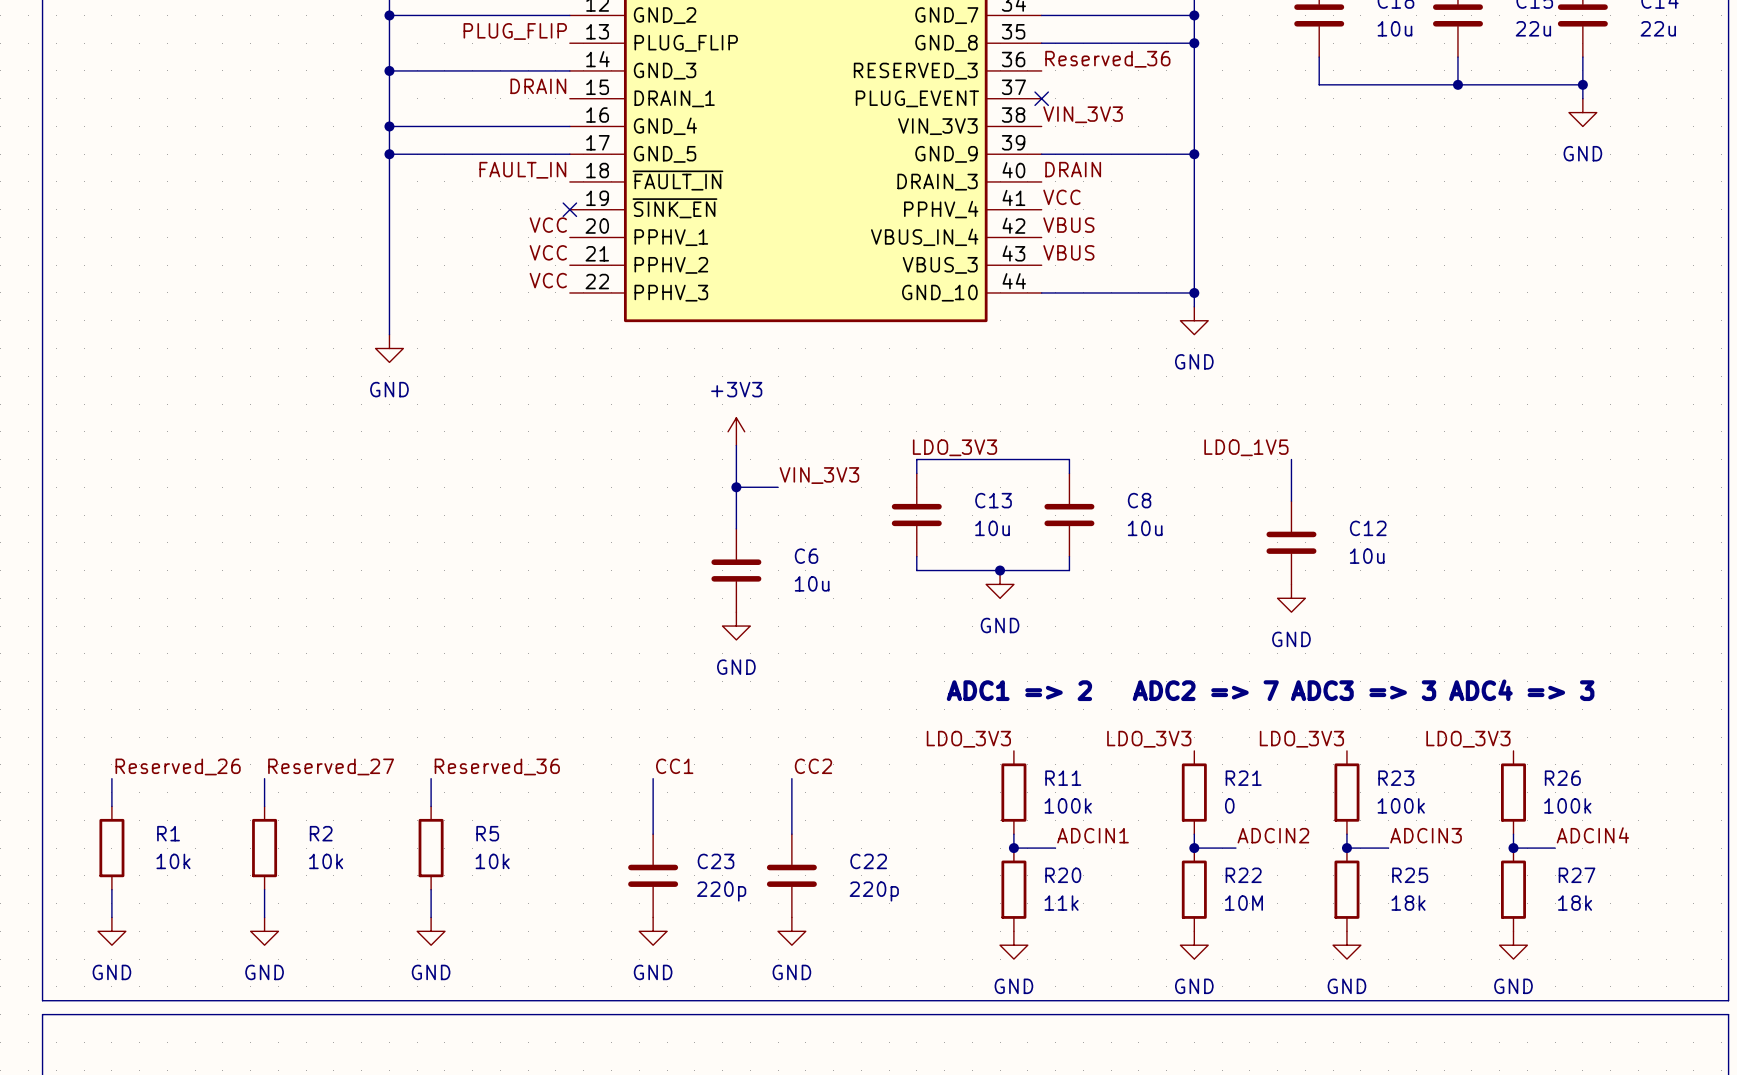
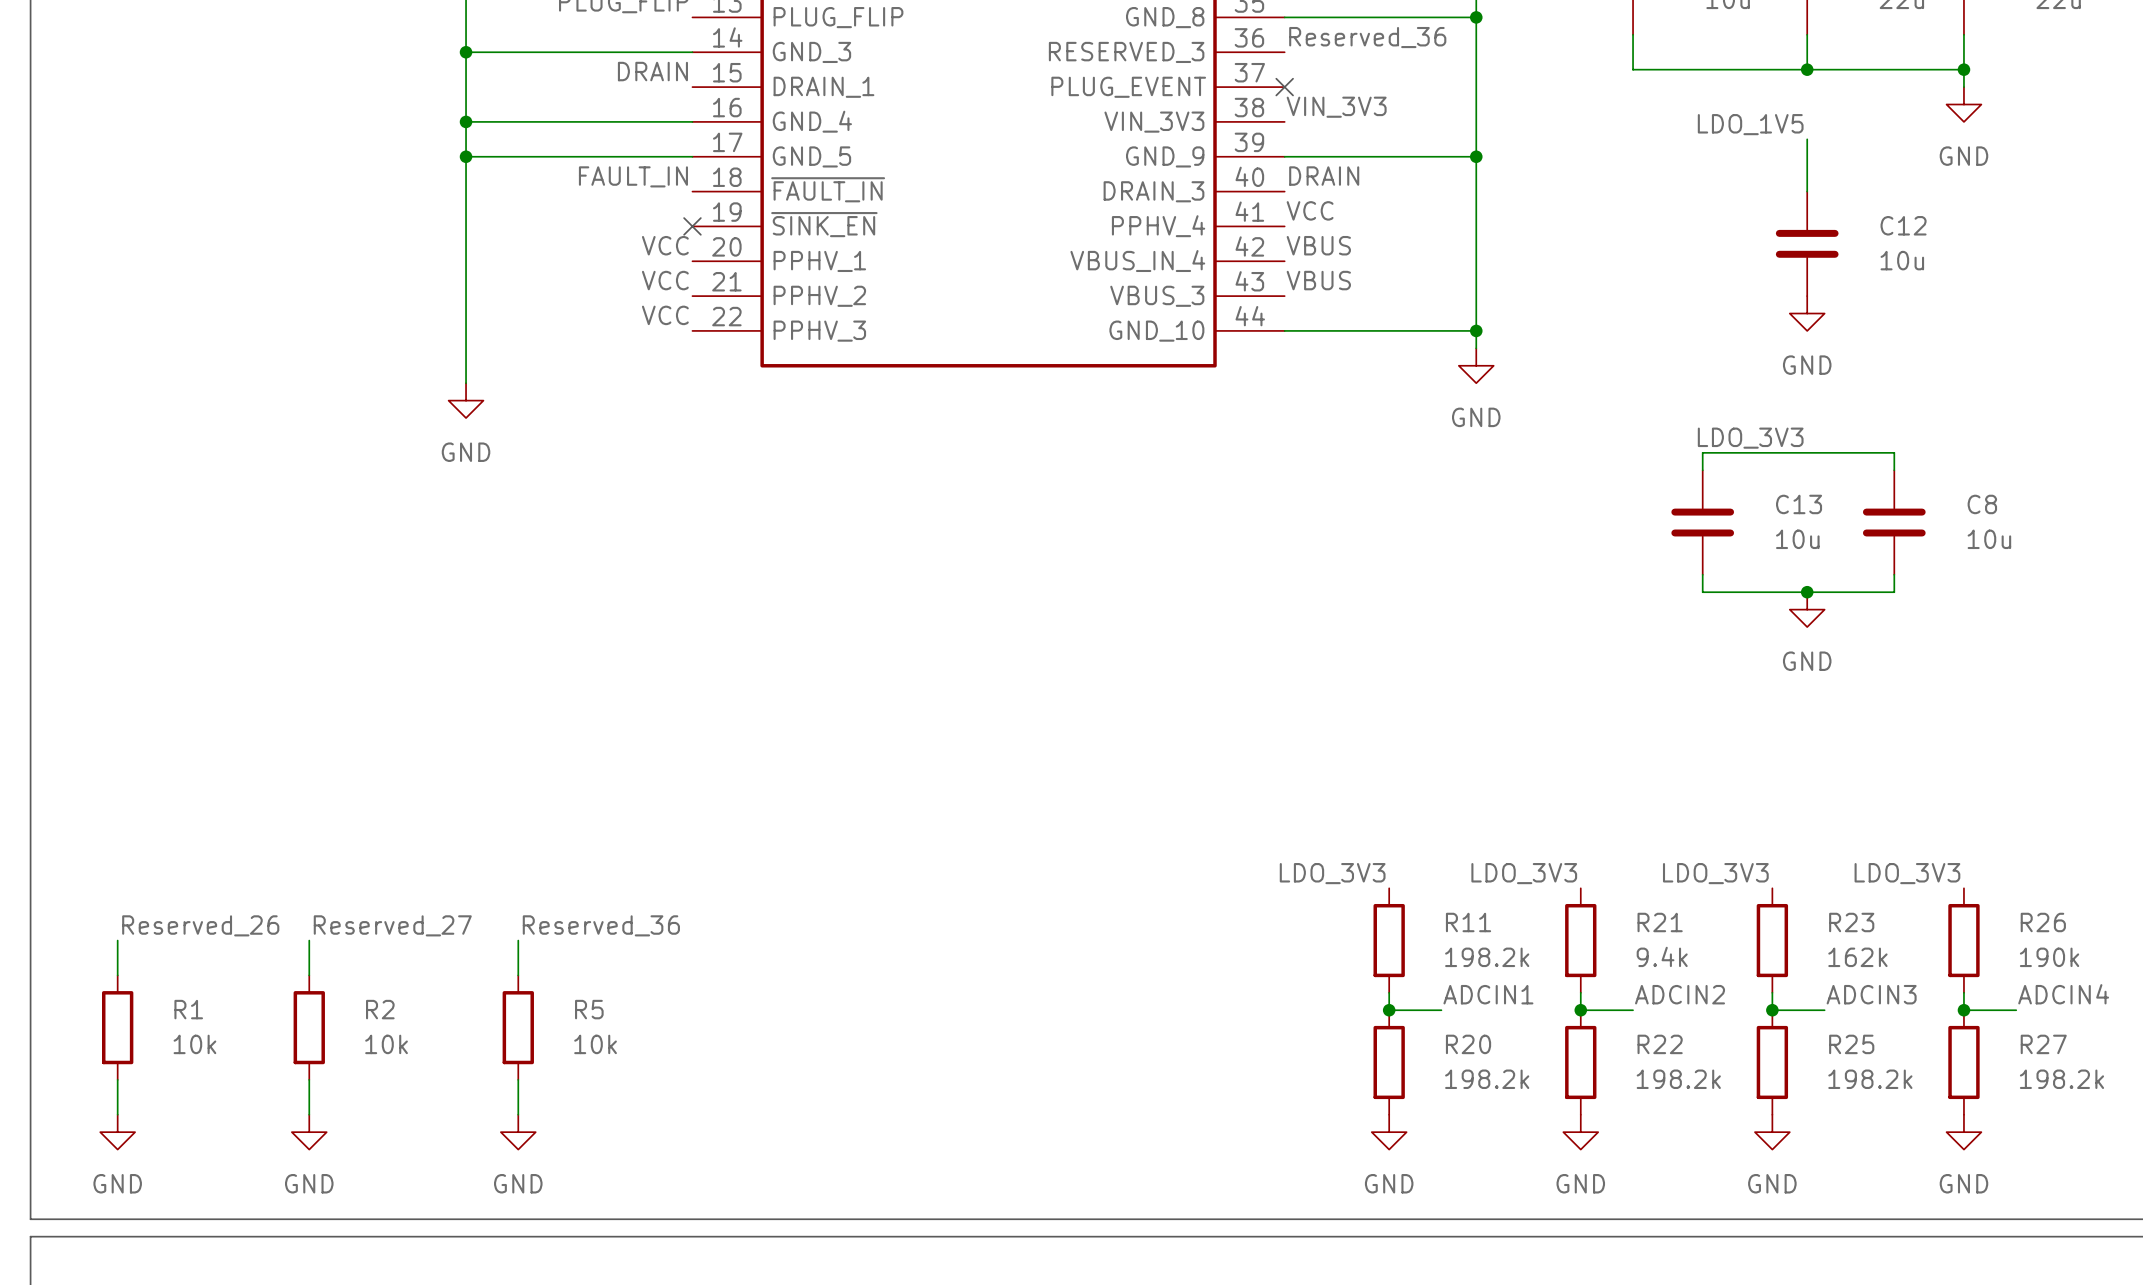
label: none -> LDO_1V5 (1750, 124)
wire: none -> (1807, 139) (1807, 191)
power symbol: none -> GND (1807, 313)
label: none -> LDO_3V3 (1750, 438)
wire: none -> (1702, 470) (1702, 452) (1894, 452) (1894, 470)
power symbol: +3V3 (736, 431) -> none
wire: (736, 445) (736, 528) -> none
label: LDO_3V3 (955, 447) -> none
label: LDO_1V5 (1246, 447) -> none
wire: (1291, 459) (1291, 501) -> none
wire: (916, 473) (916, 459) (1069, 459) (1069, 473) -> none
label: VIN_3V3 (819, 475) -> none
wire: (736, 487) (778, 487) -> none
junction: (736, 487) -> none
wire: none -> (1702, 574) (1702, 592) (1894, 592) (1894, 574)
junction: none -> (1807, 592)
C13 position: (916, 515) -> (1702, 522)
C8 position: (1069, 515) -> (1894, 522)
power symbol: none -> GND (1807, 609)
C12 position: (1291, 542) -> (1807, 243)
wire: (916, 556) (916, 570) (1069, 570) (1069, 556) -> none
C6: 10u (736, 570) -> none
junction: (1000, 570) -> none
power symbol: GND (1000, 584) -> none
power symbol: GND (1291, 598) -> none
power symbol: GND (736, 626) -> none
text: ADC1 => 2 (1019, 690) -> none
text: ADC2 => 7 (1205, 690) -> none
text: ADC3 => 3 (1363, 690) -> none
text: ADC4 => 3 (1521, 690) -> none
label: none -> LDO_3V3 (1332, 873)
label: none -> LDO_3V3 (1524, 873)
label: none -> LDO_3V3 (1715, 873)
label: none -> LDO_3V3 (1907, 873)
label: LDO_3V3 (968, 739) -> none
label: LDO_3V3 (1149, 739) -> none
label: LDO_3V3 (1301, 739) -> none
label: LDO_3V3 (1468, 739) -> none
label: CC1 (674, 766) -> none
label: CC2 (813, 766) -> none
wire: (653, 778) (653, 834) -> none
wire: (791, 778) (791, 834) -> none
R11 name position: R11 (1063, 778) -> R11 (1468, 922)
R21 name position: R21 (1243, 778) -> R21 (1660, 922)
R23 name position: R23 (1396, 778) -> R23 (1851, 922)
R26 name position: R26 (1562, 778) -> R26 (2043, 922)
R11 position: (1013, 792) -> (1389, 940)
R21 position: (1194, 792) -> (1580, 940)
R23 position: (1346, 792) -> (1772, 940)
R26 position: (1513, 792) -> (1963, 940)
R11 value: 100k (1068, 805) -> 198.2k (1487, 957)
R21 value: 0 (1229, 805) -> 9.4k (1662, 956)
R23 value: 100k (1401, 805) -> 162k (1857, 957)
R26 value: 100k (1567, 805) -> 190k (2049, 957)
wire: none -> (1772, 992) (1772, 1010) (1824, 1010)
wire: (1013, 834) (1013, 848) (1055, 848) -> none
junction: none -> (1389, 1010)
wire: (1194, 834) (1194, 848) (1235, 848) -> (1389, 992) (1389, 1010) (1441, 1010)
junction: none -> (1580, 1010)
wire: (1346, 834) (1346, 848) (1388, 848) -> (1580, 992) (1580, 1010) (1633, 1010)
junction: none -> (1772, 1010)
wire: (1513, 834) (1513, 848) (1555, 848) -> (1963, 992) (1963, 1010) (2016, 1010)
junction: none -> (1963, 1010)
label position: ADCIN1 (1092, 835) -> ADCIN1 (1488, 994)
label position: ADCIN2 (1273, 835) -> ADCIN2 (1680, 994)
label position: ADCIN3 (1426, 835) -> ADCIN3 (1871, 994)
label position: ADCIN4 (1592, 835) -> ADCIN4 (2063, 994)
junction: (1013, 848) -> none
junction: (1194, 848) -> none
junction: (1346, 848) -> none
junction: (1513, 848) -> none
C23: 220p (653, 875) -> none
C22: 220p (791, 875) -> none
R20 name position: R20 (1063, 875) -> R20 (1468, 1044)
R22 name position: R22 (1243, 875) -> R22 (1660, 1044)
R20 position: (1013, 889) -> (1389, 1062)
R22 position: (1194, 889) -> (1580, 1062)
R25 position: (1346, 889) -> (1772, 1062)
R27 position: (1513, 889) -> (1963, 1062)
R20 value: 11k (1061, 903) -> 198.2k (1487, 1079)
R22 value: 10M (1243, 903) -> 198.2k (1678, 1079)
R25 value: 18k (1408, 903) -> 198.2k (1870, 1079)
R27 value: 18k (1575, 903) -> 198.2k (2061, 1079)
power symbol: GND (653, 931) -> none
power symbol: GND (791, 931) -> none
power symbol: none -> GND (1389, 1132)
power symbol: none -> GND (1580, 1132)
power symbol: none -> GND (1772, 1132)
power symbol: none -> GND (1963, 1132)
power symbol: GND (1013, 945) -> none
power symbol: GND (1194, 945) -> none
power symbol: GND (1346, 945) -> none
power symbol: GND (1513, 945) -> none

